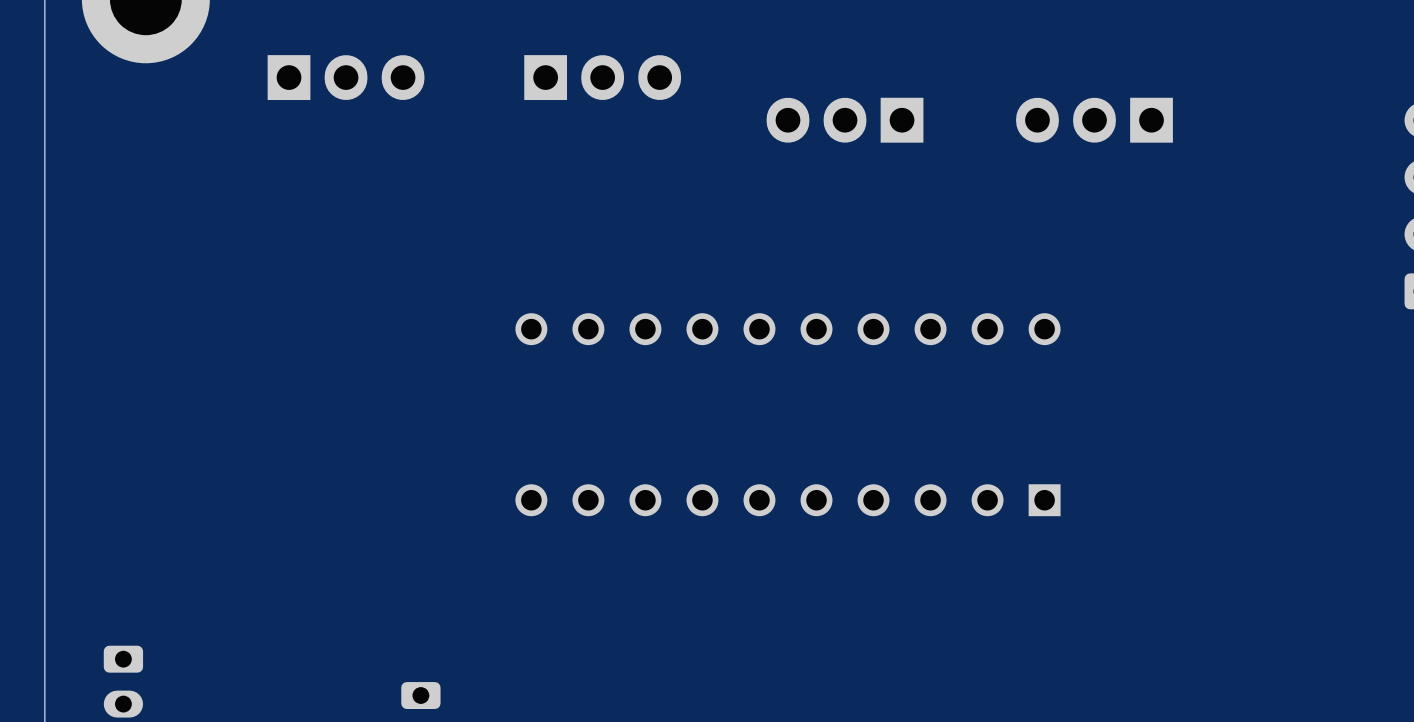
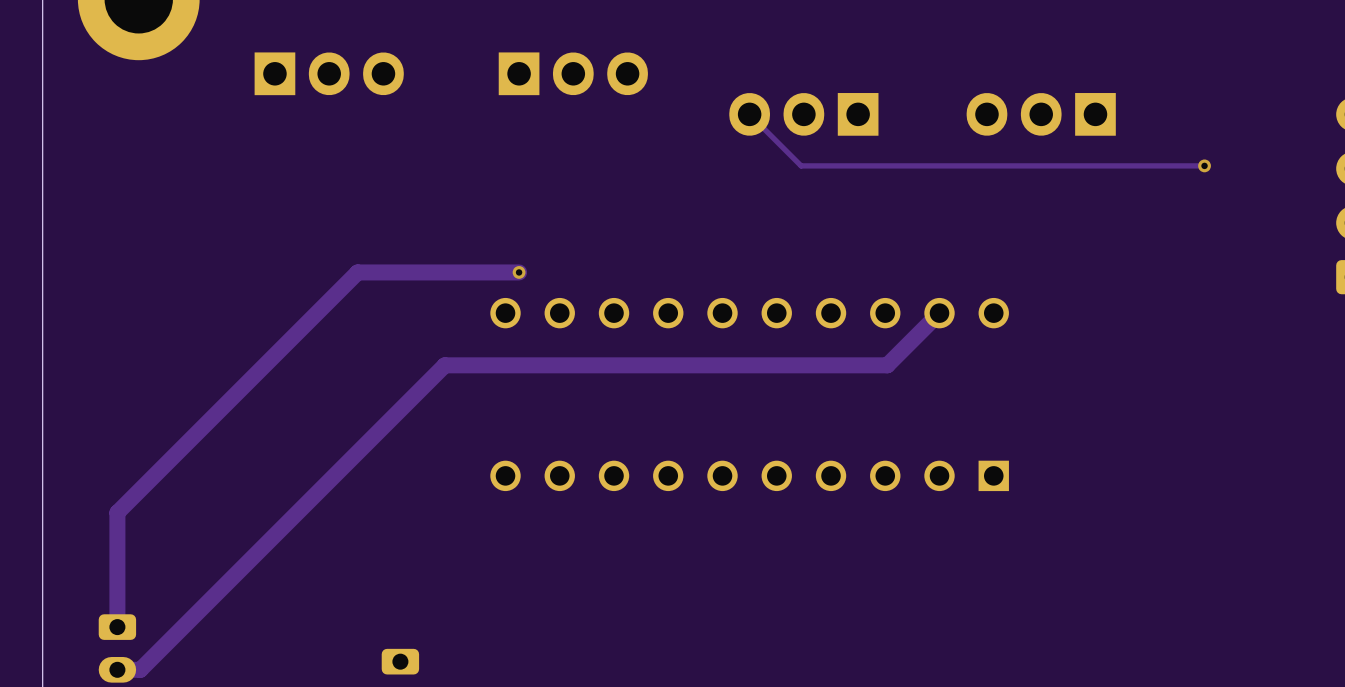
track: none -> (749, 114) (801, 165) (1204, 165)
via: none -> (1204, 165)
track: none -> (519, 272) (357, 272) (117, 512) (117, 627)
via: none -> (519, 272)
track: none -> (939, 313) (887, 365) (444, 365) (140, 669) (117, 669)

